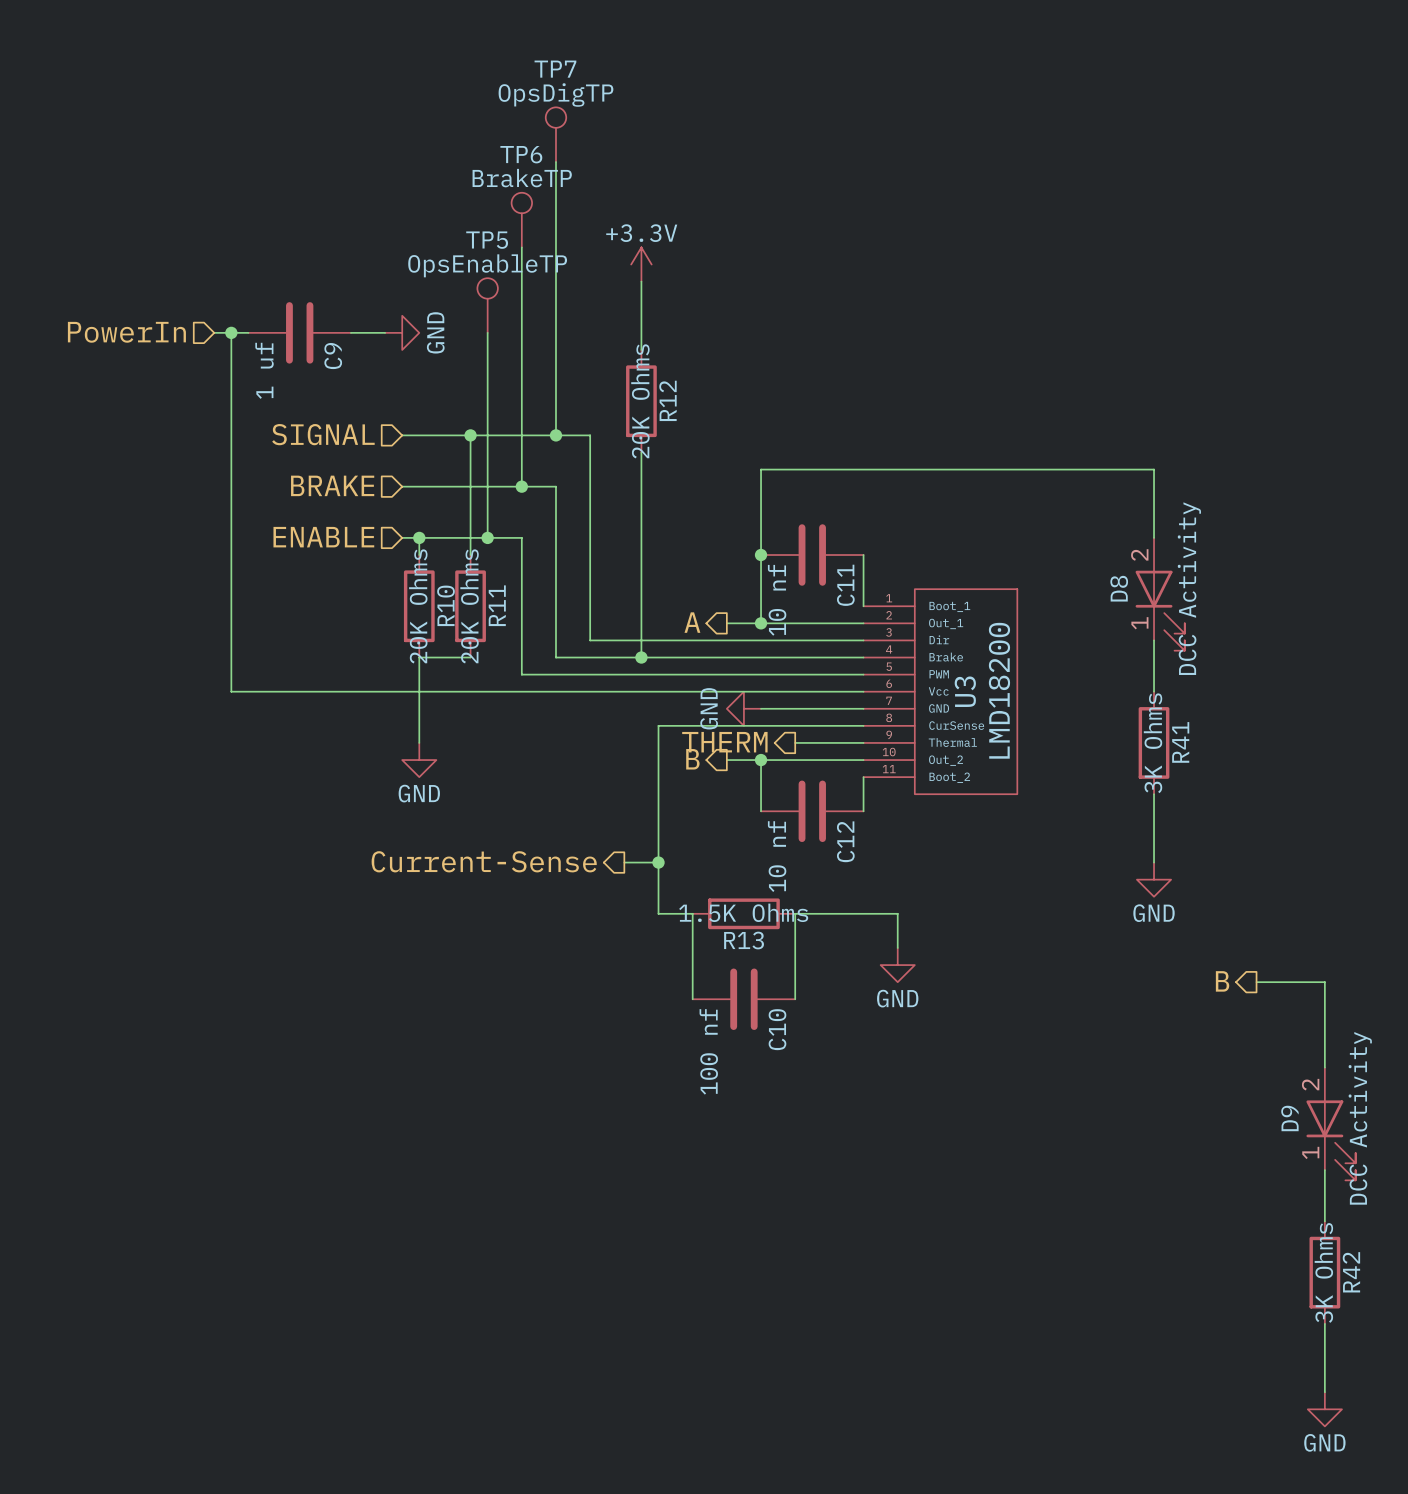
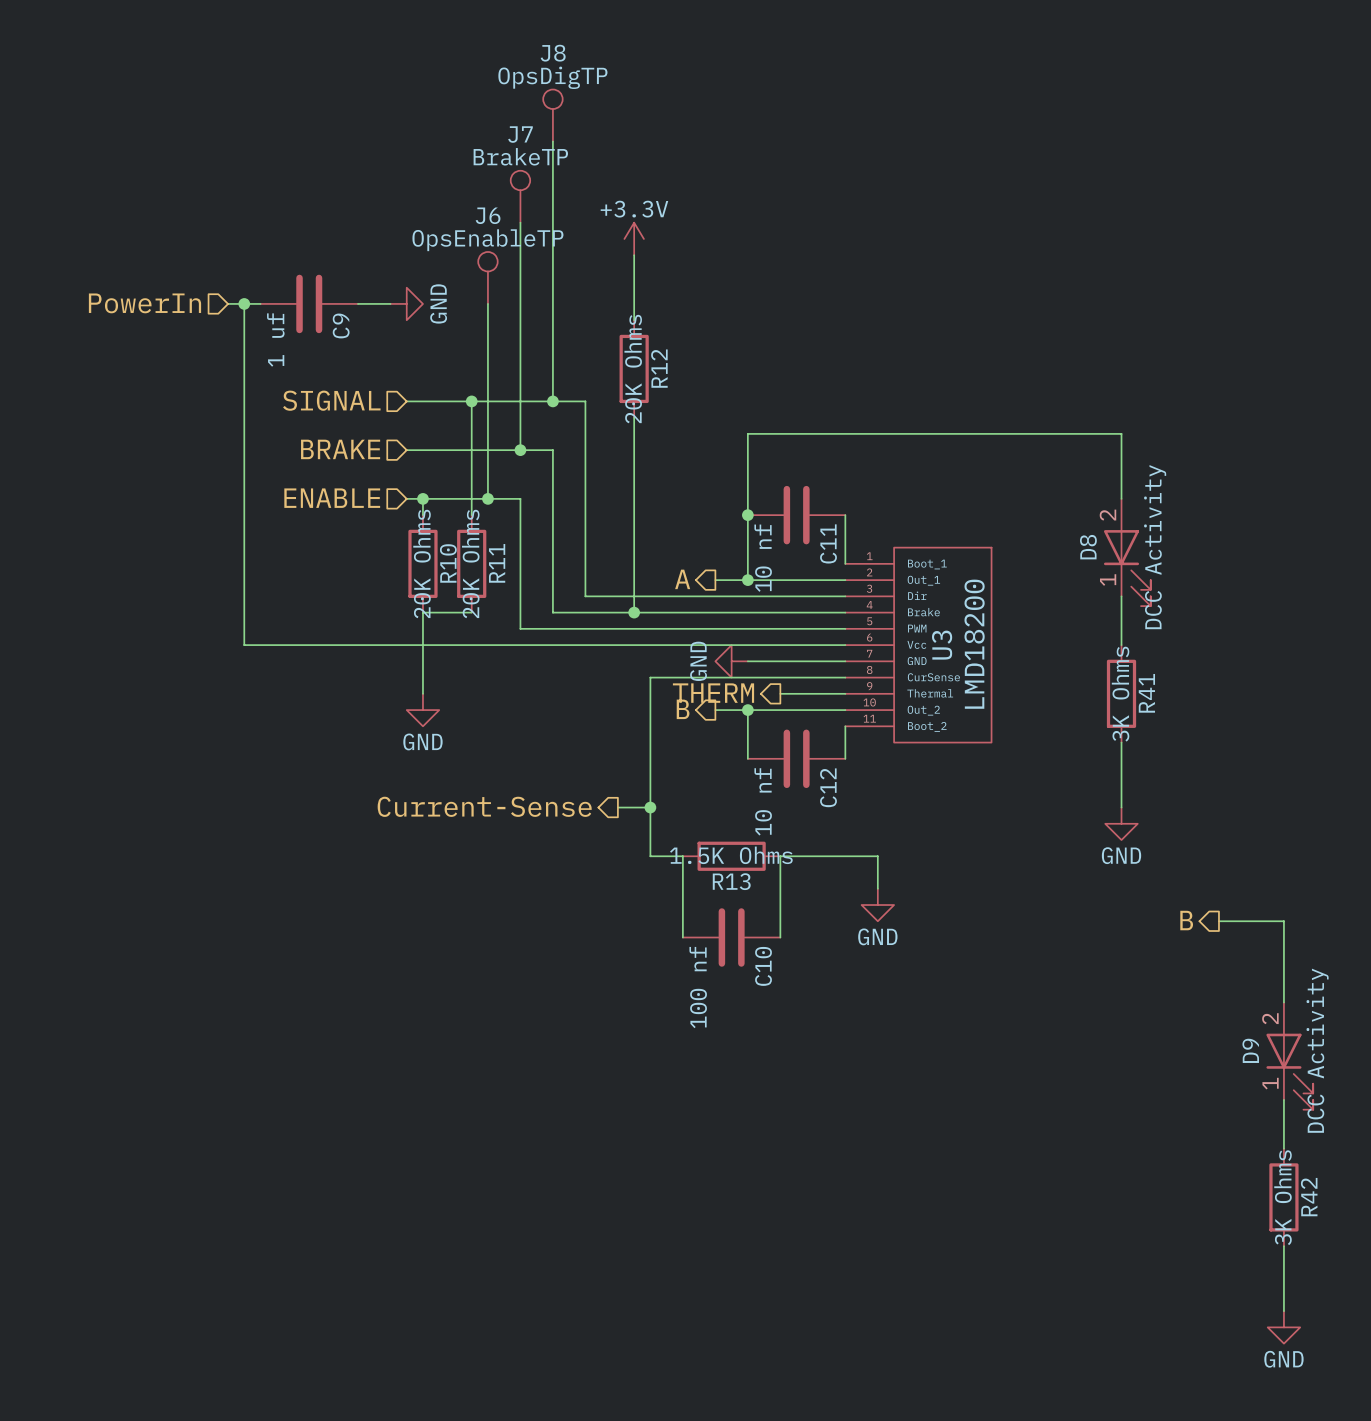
TP7 name: TP7 (555, 69) -> J8 (553, 53)
TP6 name: TP6 (521, 154) -> J7 (520, 134)
TP5 name: TP5 (487, 240) -> J6 (488, 215)

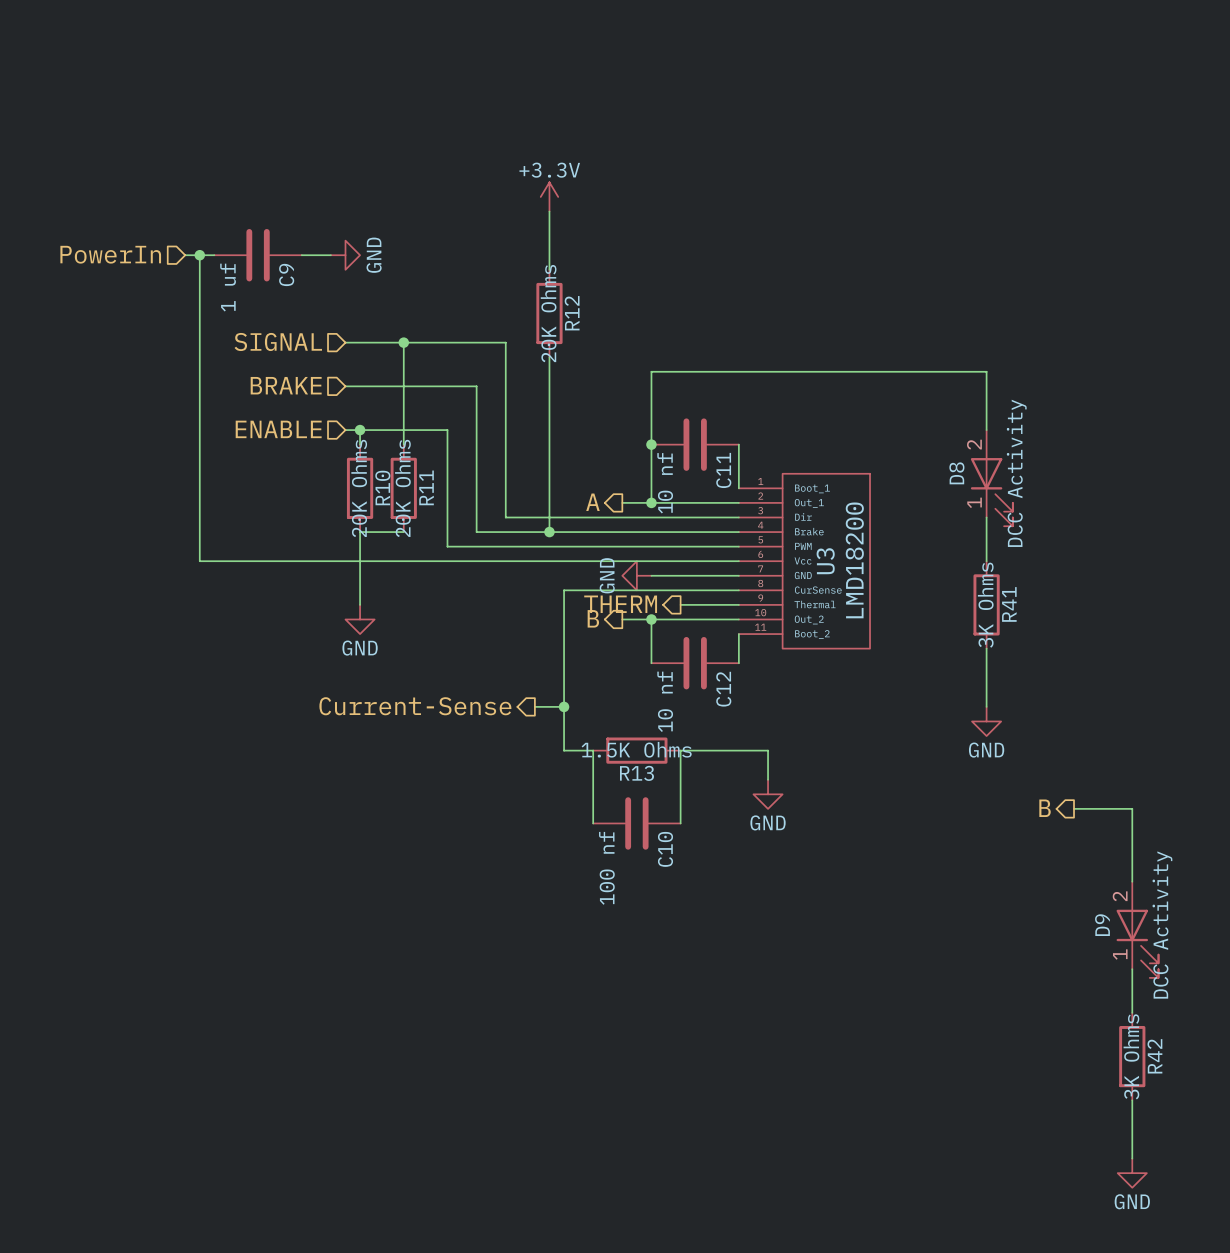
J8: OpsDigTP (552, 115) -> none
wire: (552, 141) (552, 401) -> none
J7: BrakeTP (520, 196) -> none
wire: (520, 222) (520, 450) -> none
J6: OpsEnableTP (487, 277) -> none
wire: (487, 303) (487, 498) -> none
junction: (552, 401) -> none
junction: (520, 450) -> none
junction: (487, 498) -> none

